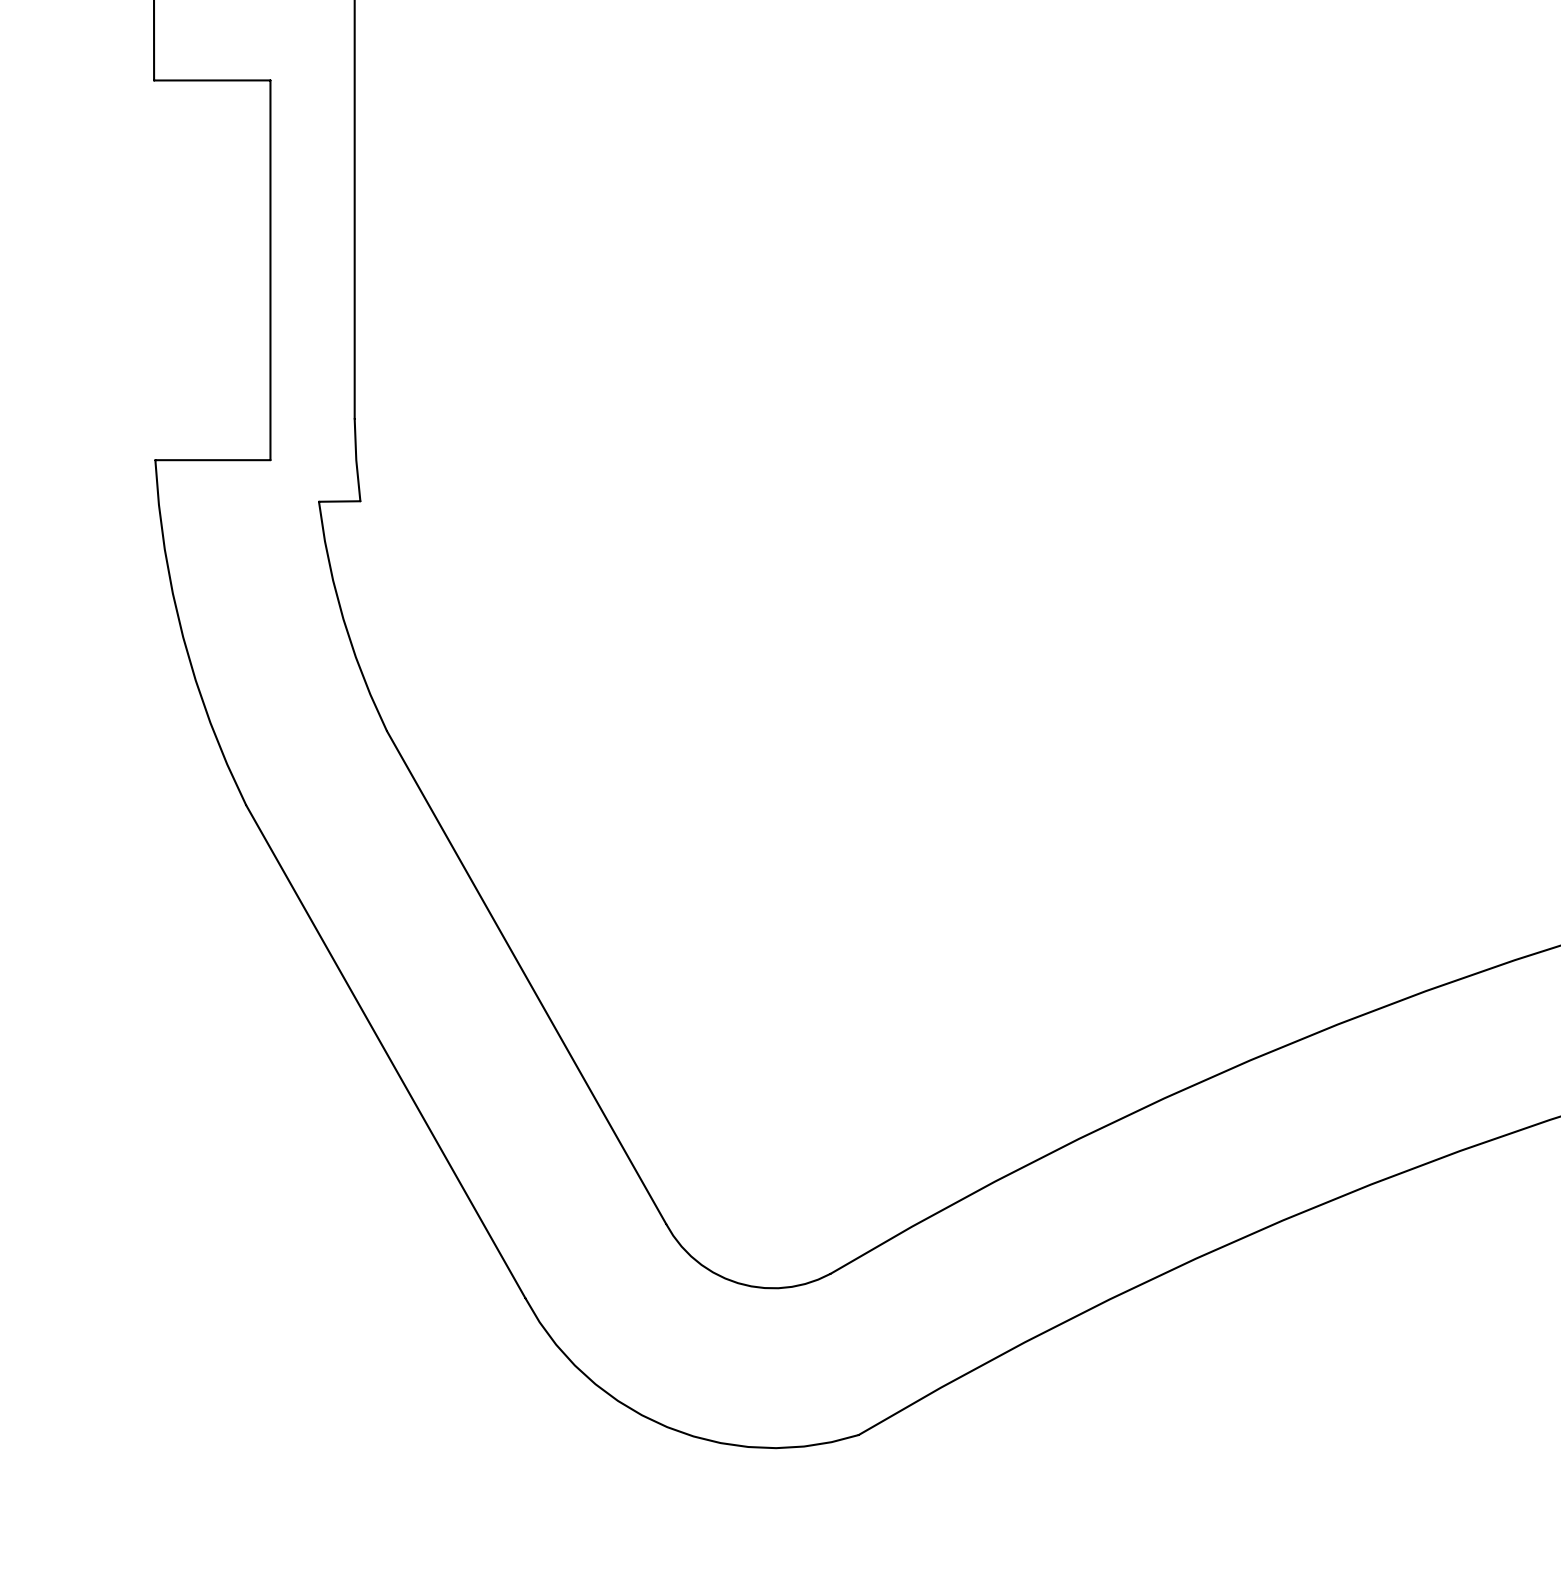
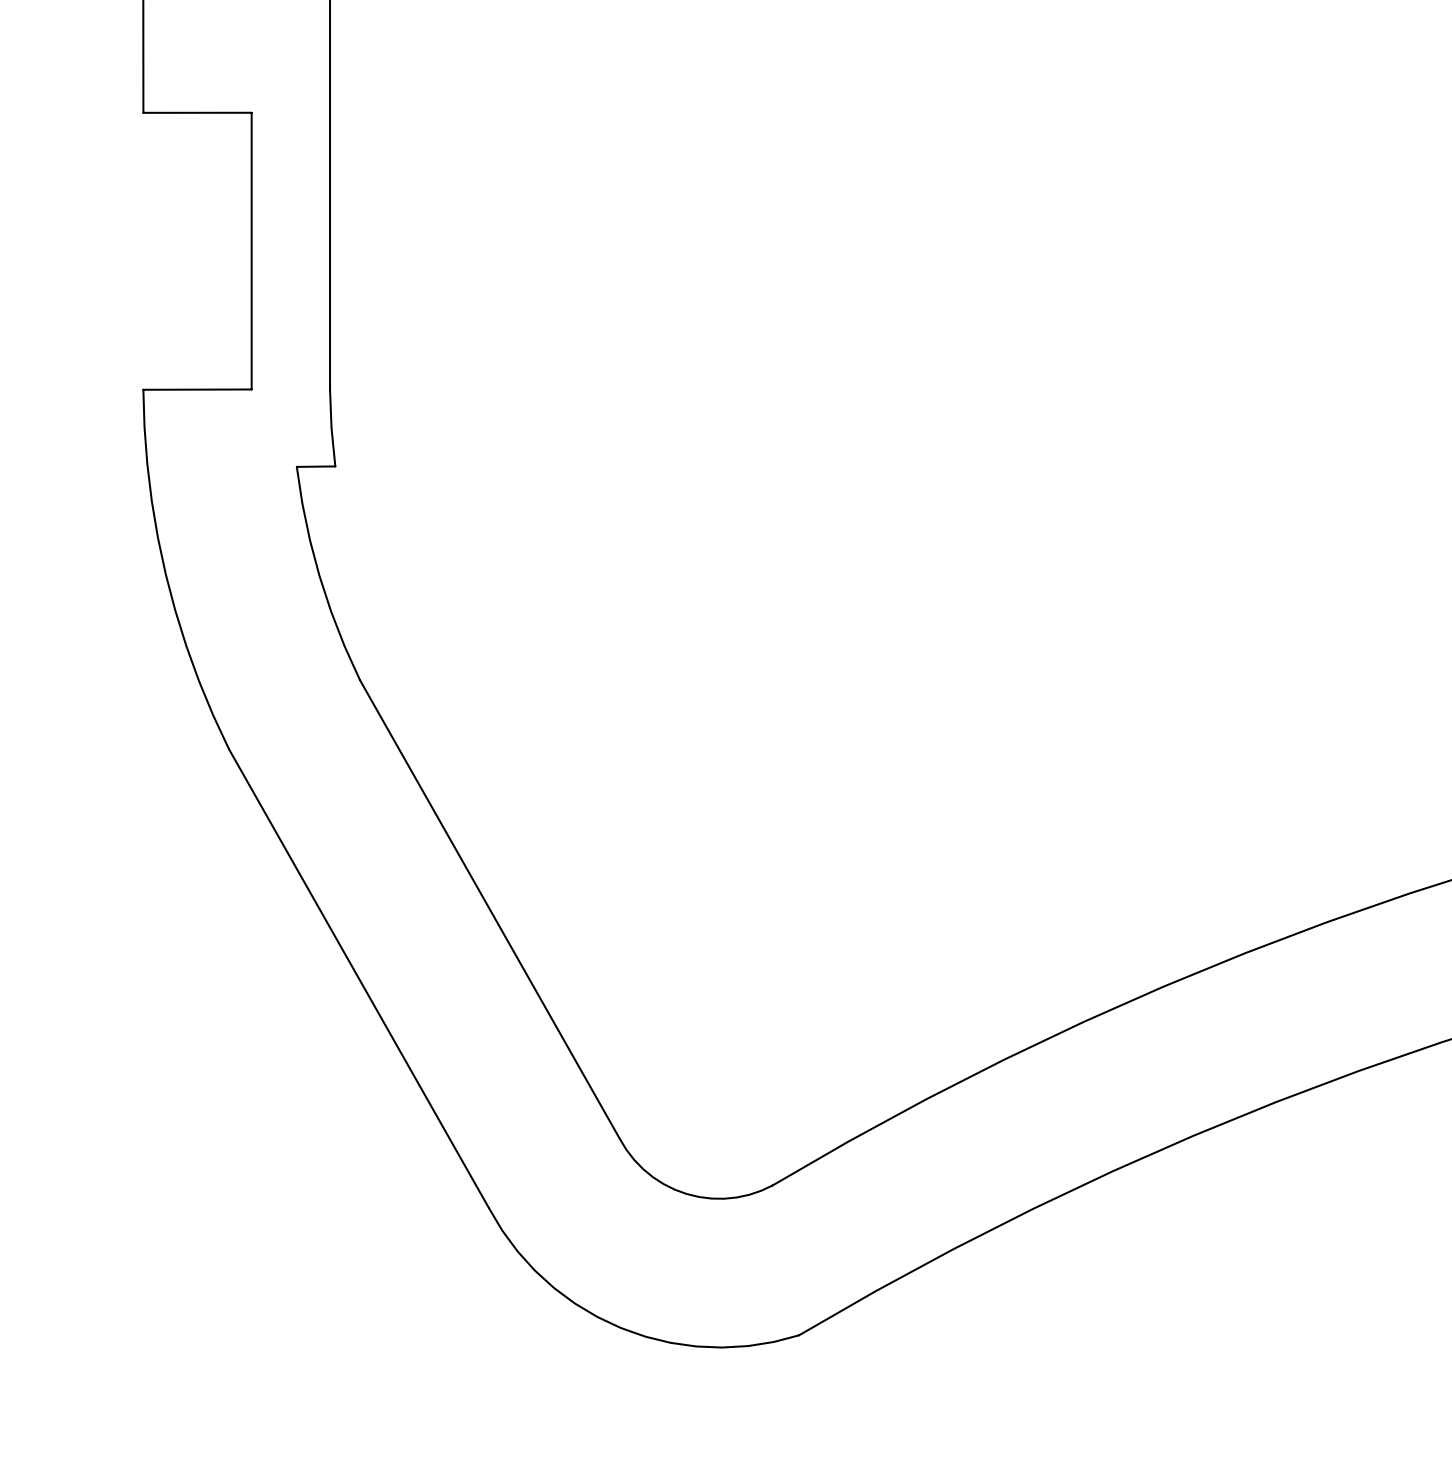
board edge: (154, 80) (270, 80) (270, 121) -> (143, 74) (143, 112) (251, 112)
board edge: (270, 418) (270, 460) (155, 460) (164, 549) (183, 637) (210, 722) (246, 805) -> (251, 389) (143, 389) (147, 464) (151, 501) (165, 574) (175, 610) (199, 681) (229, 749)

